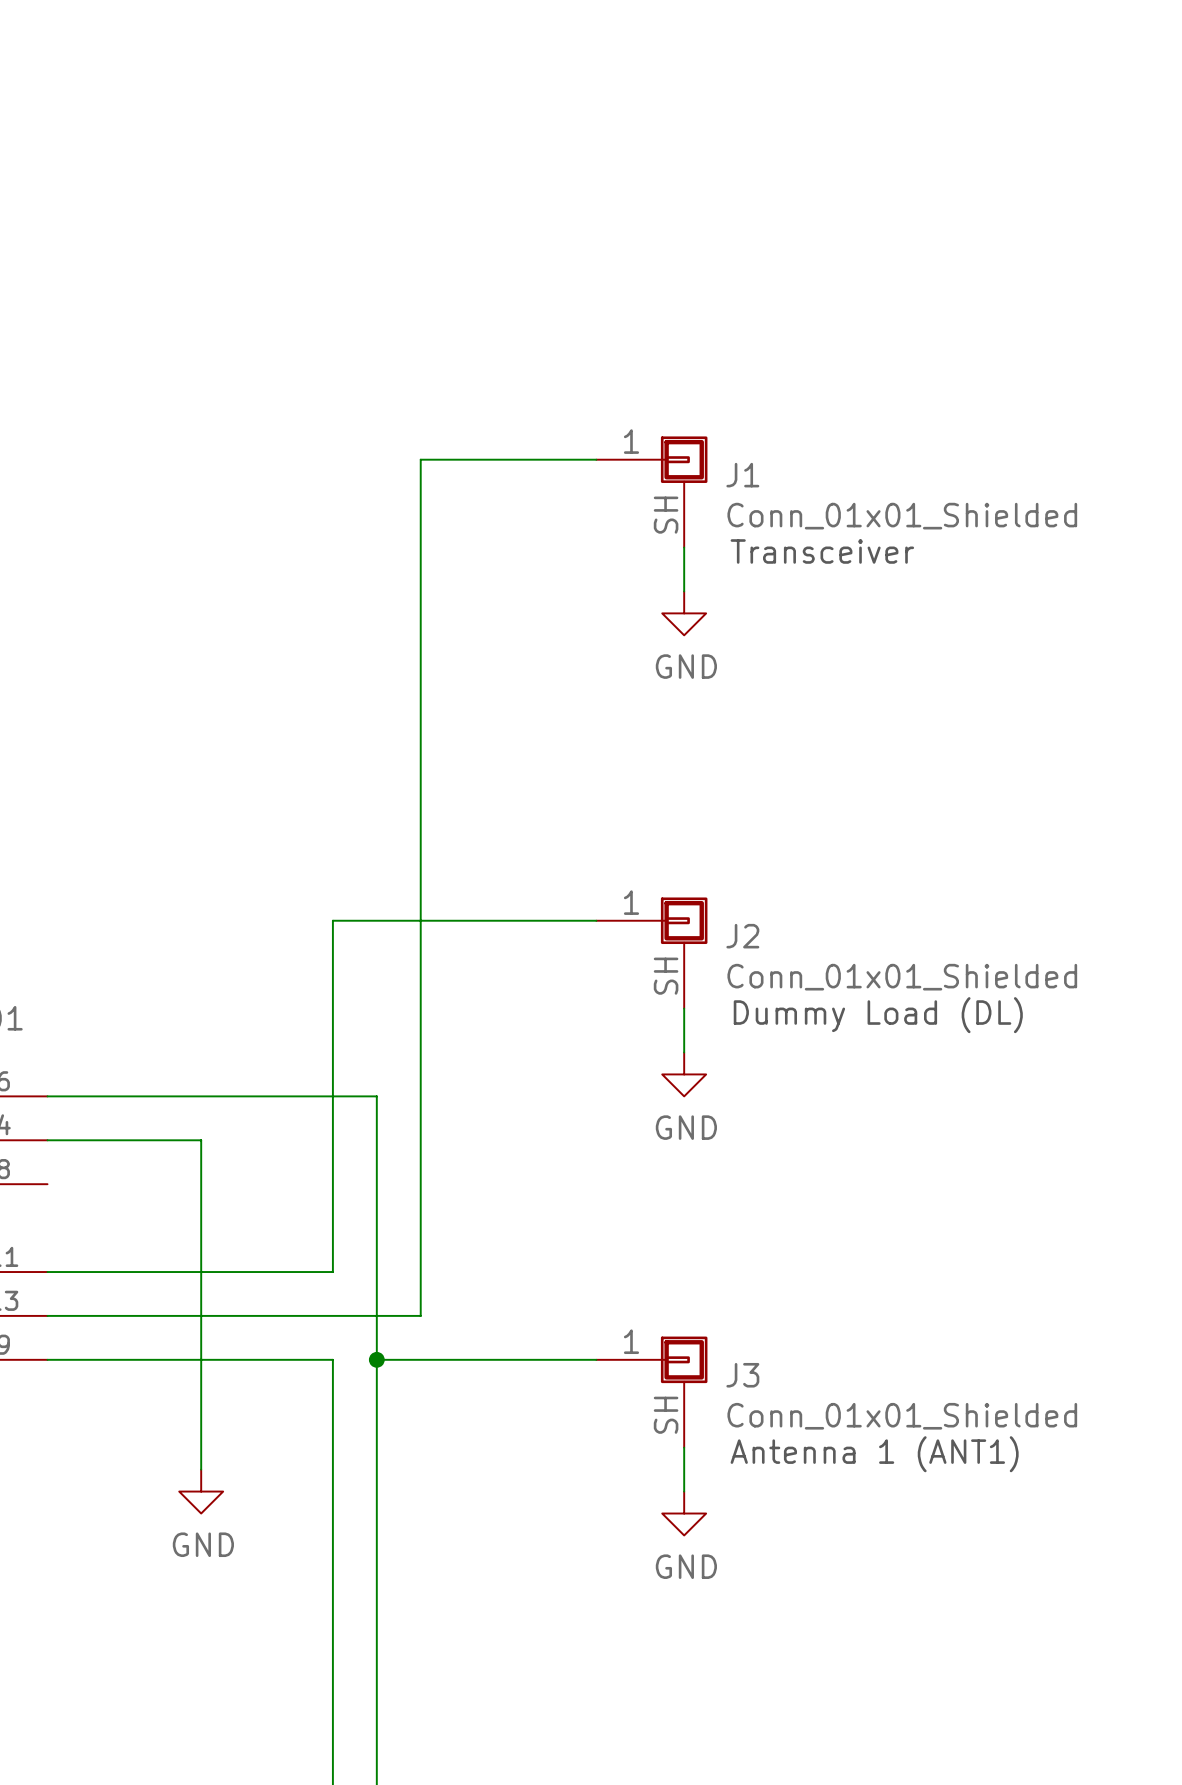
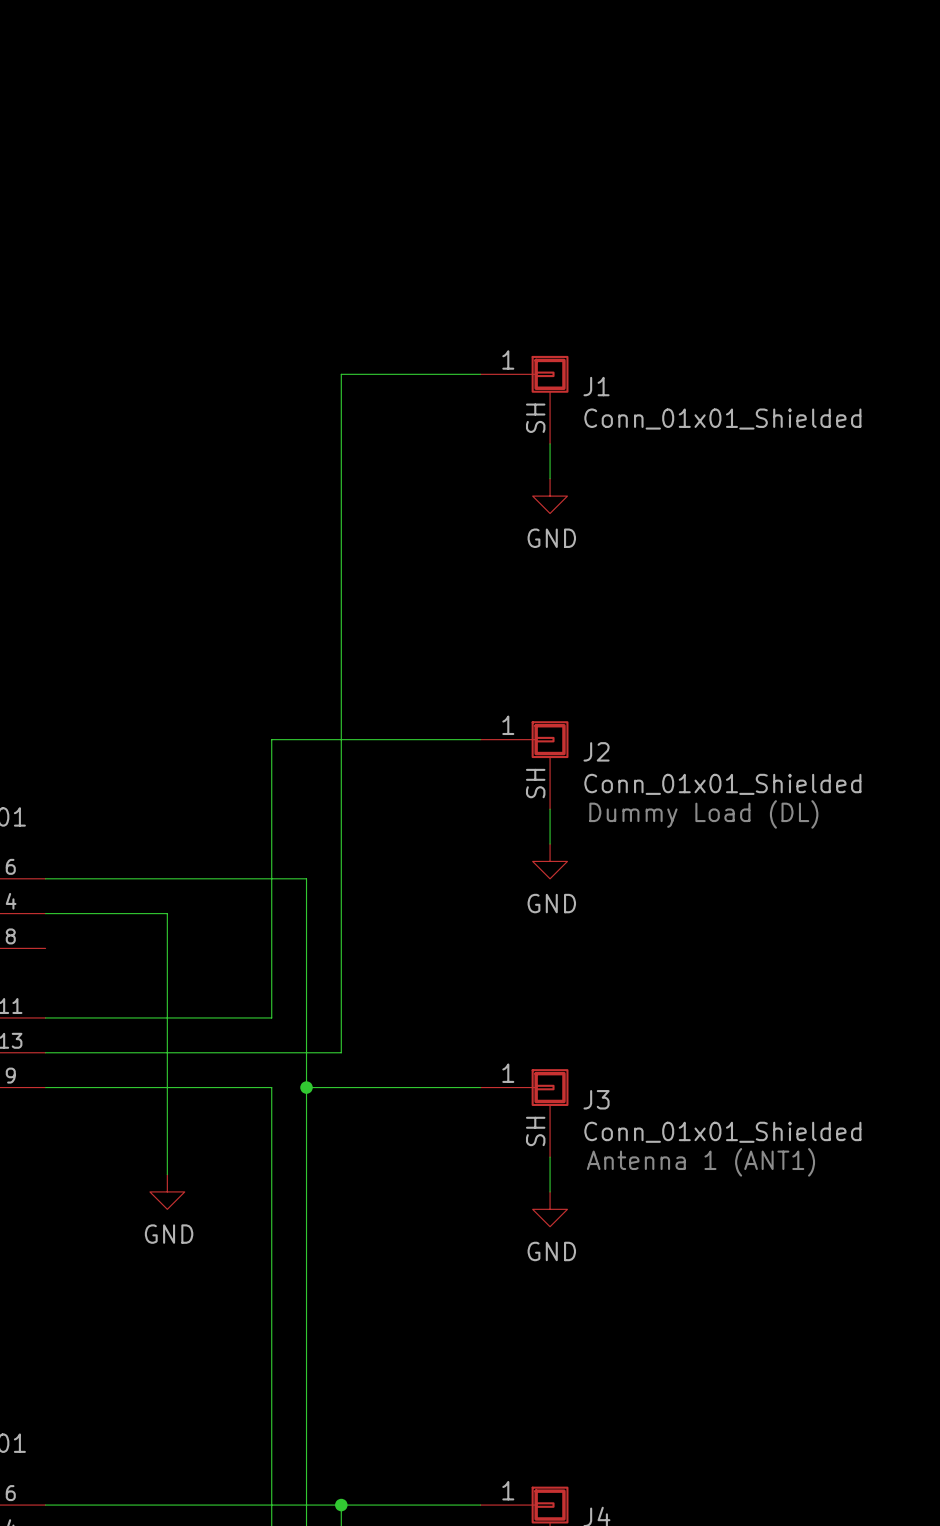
text: Transceiver (822, 551) -> none

